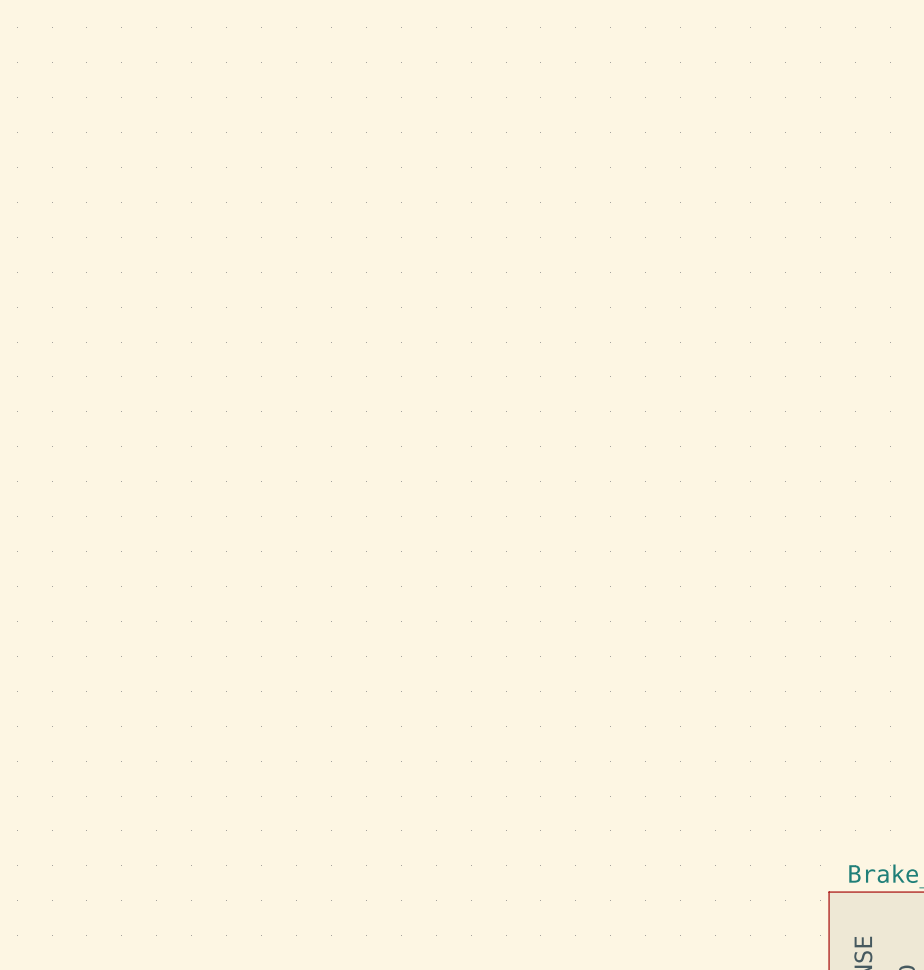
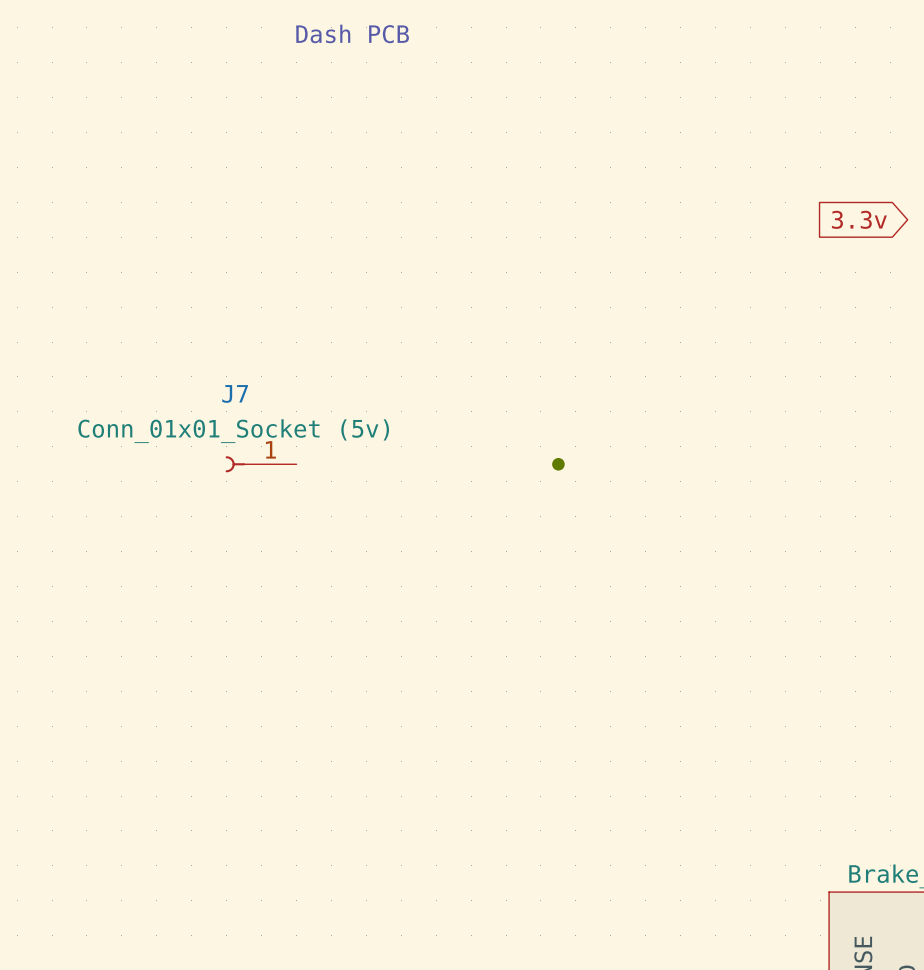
text: none -> Dash PCB (352, 33)
global label: none -> 3.3v (859, 219)
J7: none -> Conn_01x01_Socket (5v) (261, 464)
junction: none -> (558, 464)

